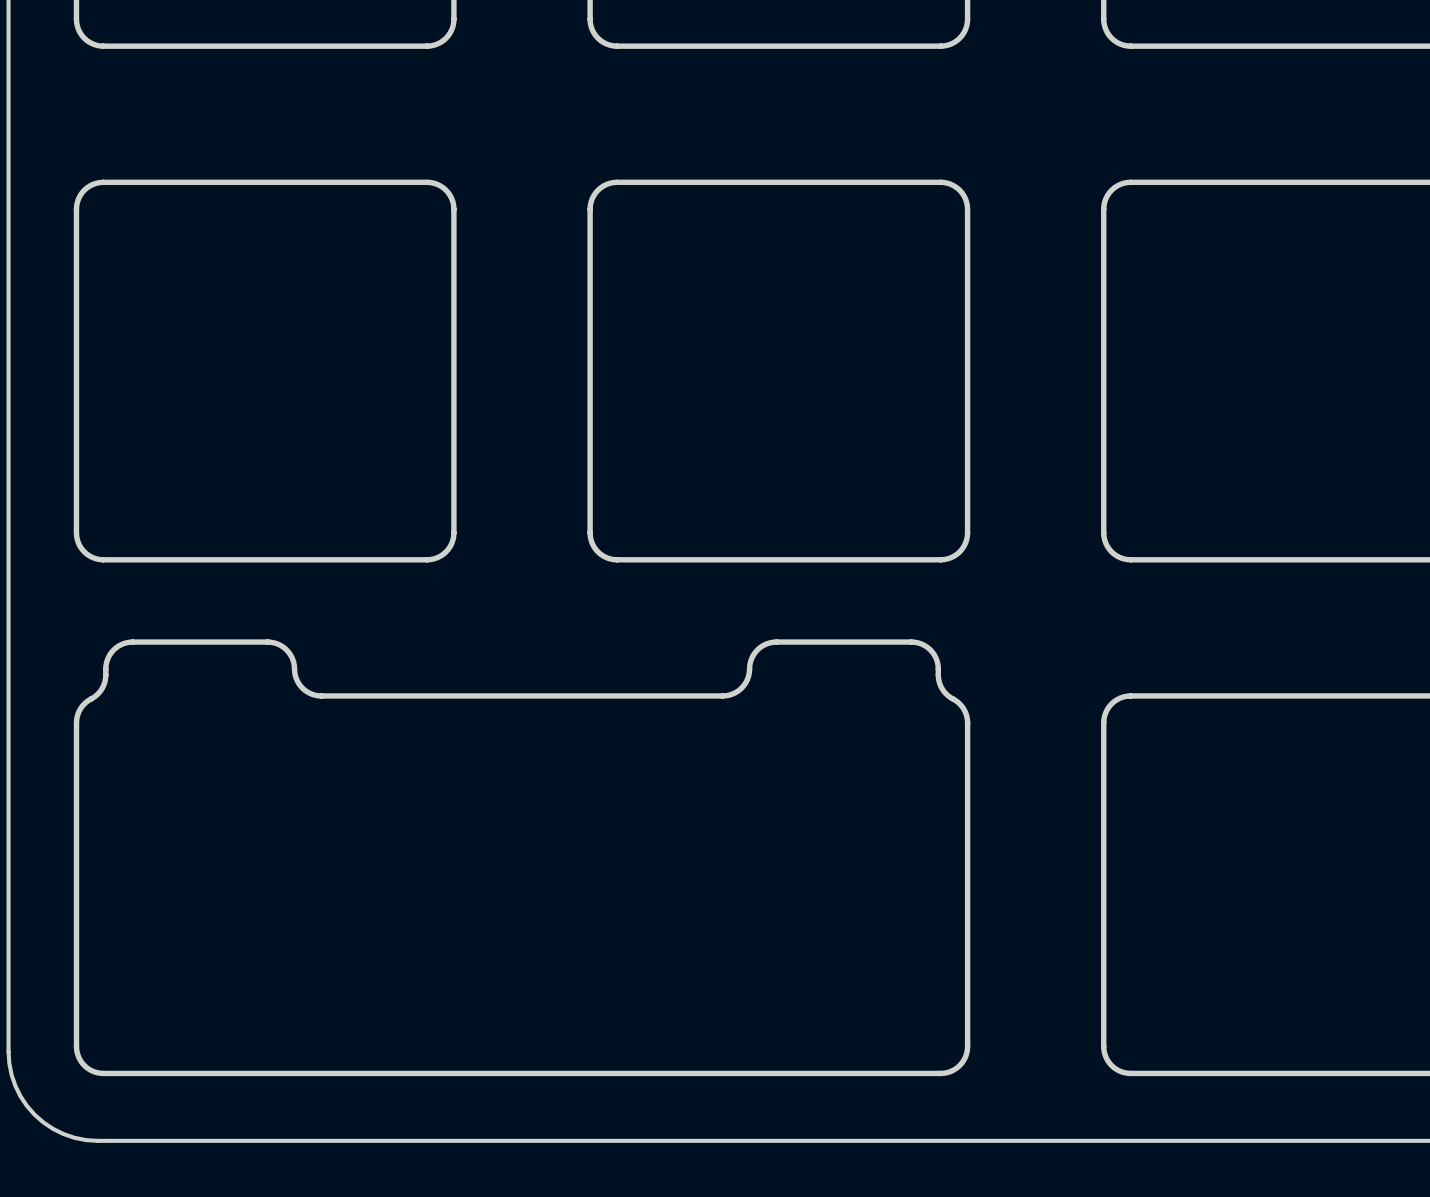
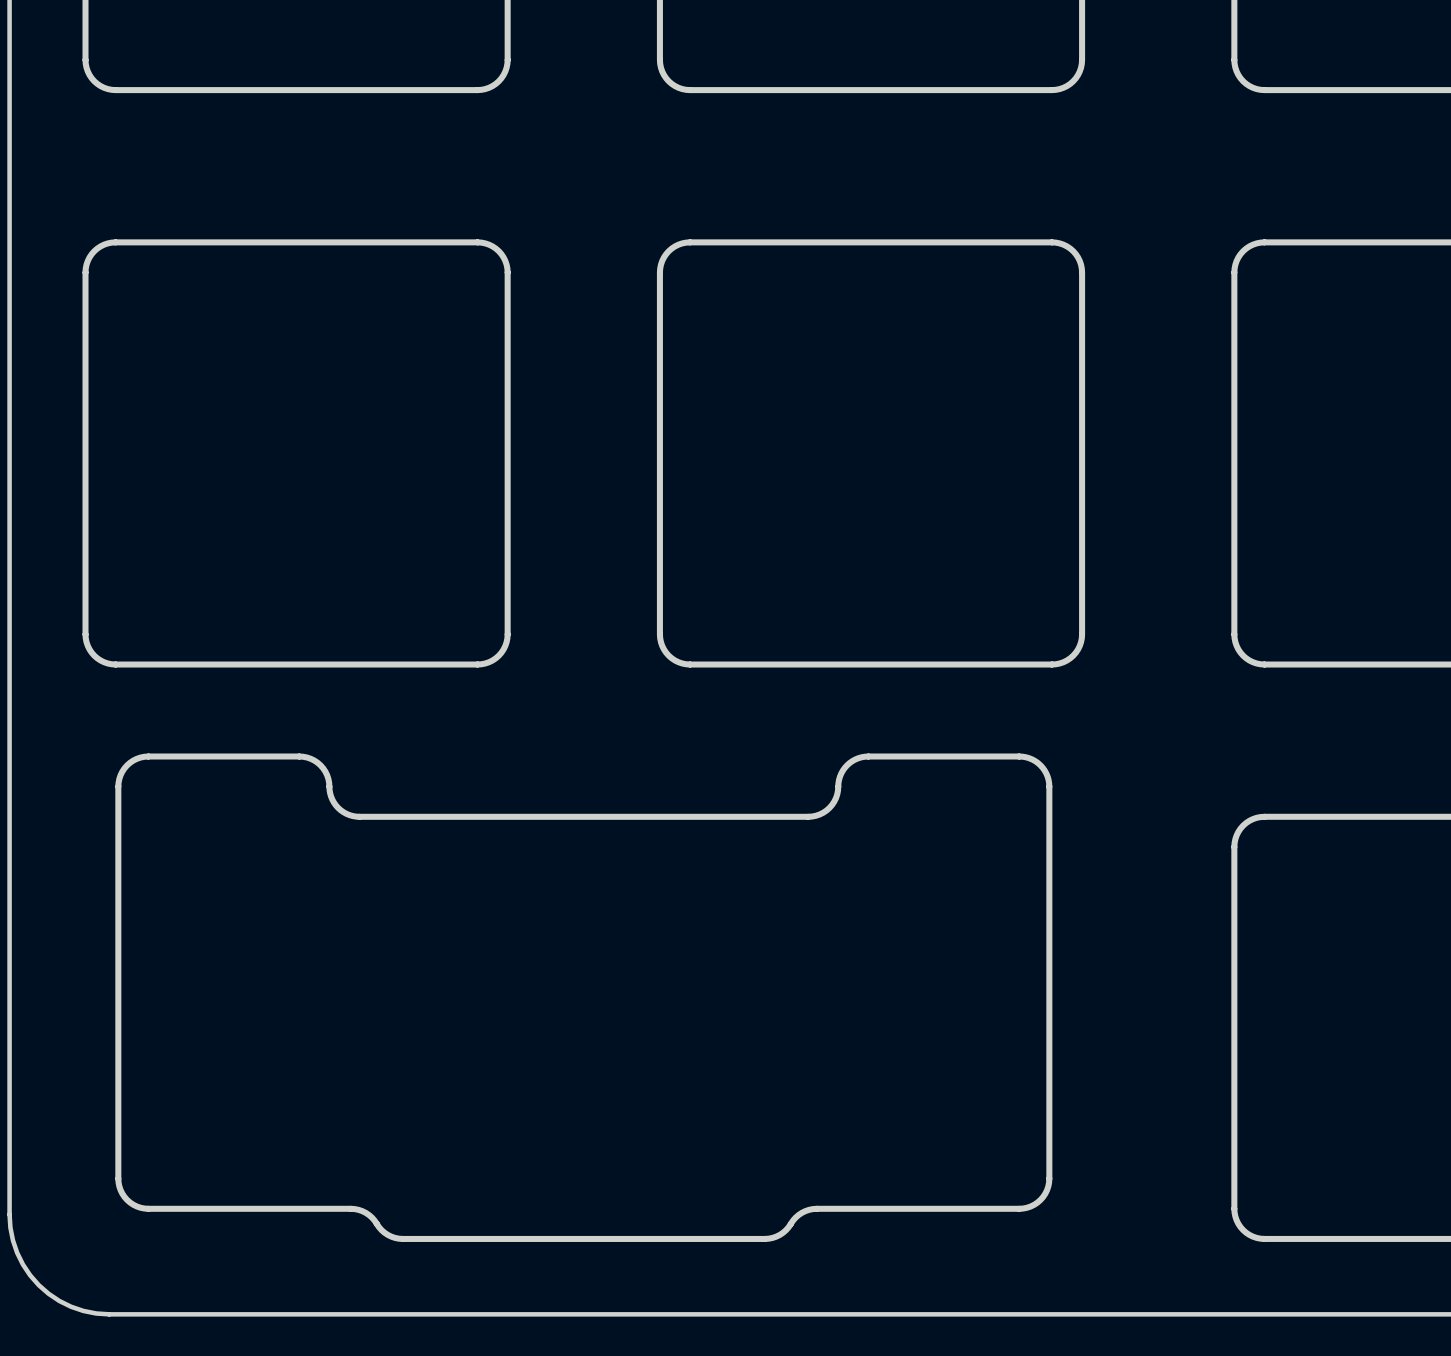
board edge: (132, 642) (121, 644) (111, 652) (106, 663) (103, 686) (98, 693) (82, 706) (76, 719) (76, 1046) (79, 1058) (89, 1069) (103, 1073) (360, 1073) -> (148, 756) (136, 758) (127, 765) (120, 775) (118, 786) (118, 1178) (122, 1193) (130, 1202) (144, 1208) (354, 1209) (369, 1215) (387, 1234) (402, 1238)
board edge: (938, 674) (942, 689) (961, 706) (967, 719) (967, 1046) (964, 1059) (954, 1069) (940, 1073) (683, 1073) -> (1049, 793) (1049, 1178) (1045, 1193) (1037, 1202) (1023, 1208) (813, 1209) (798, 1215) (779, 1234) (764, 1238)

